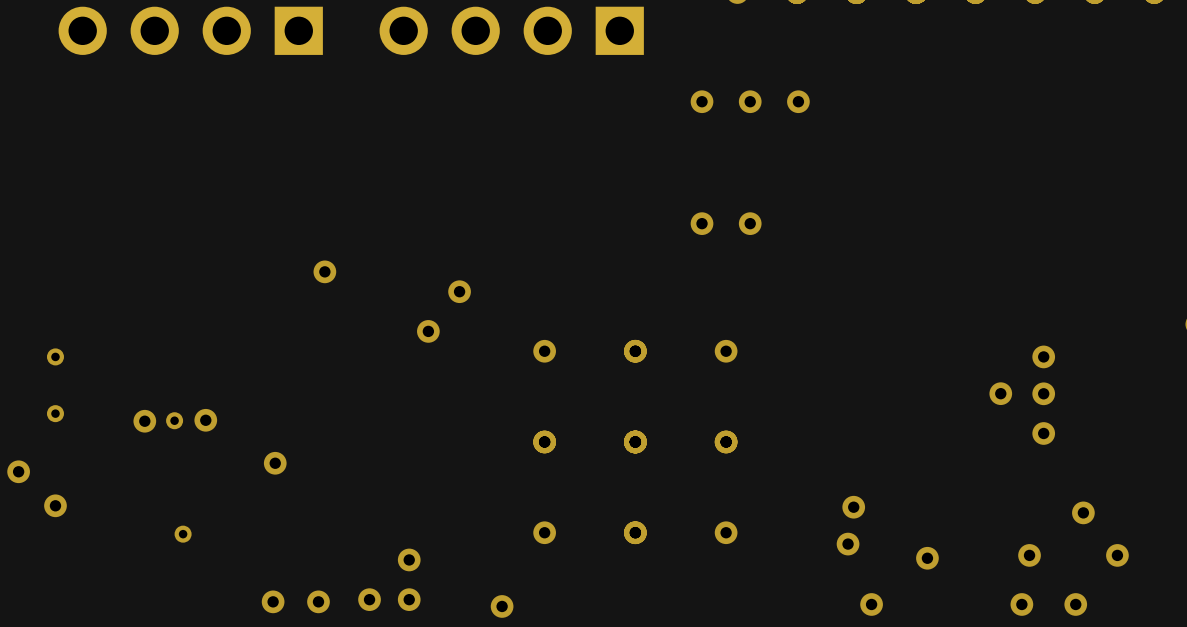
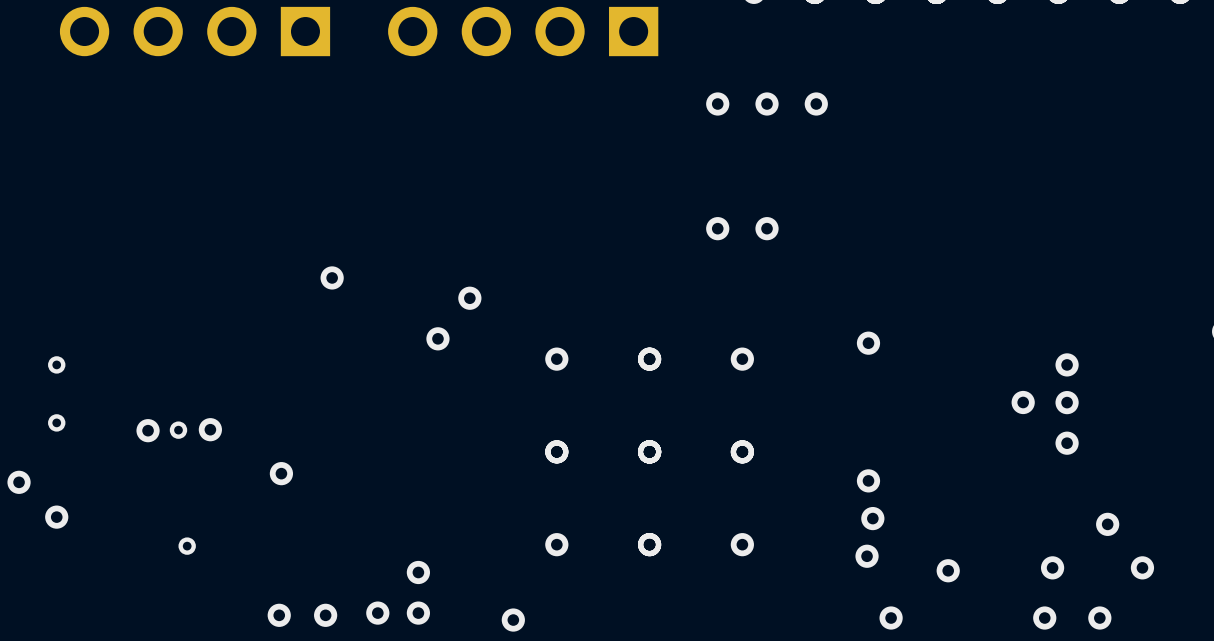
via: none -> (868, 343)
via: none -> (868, 480)

